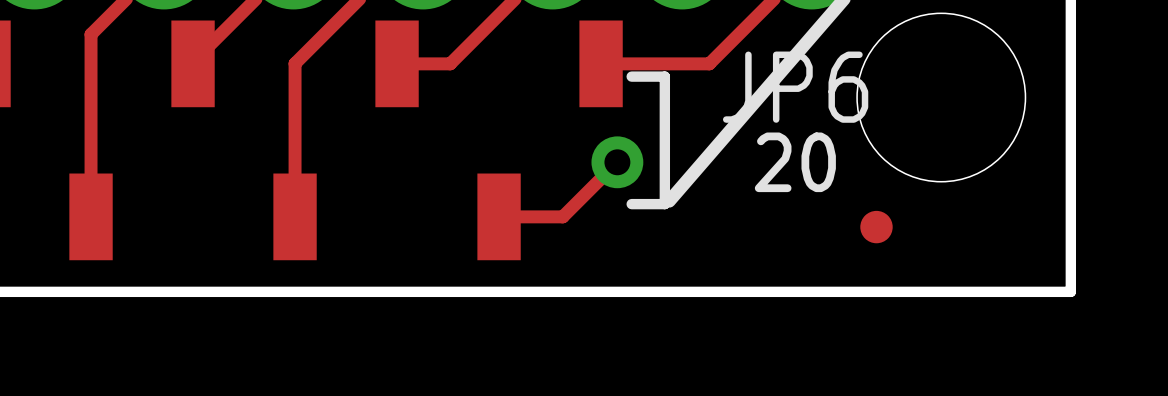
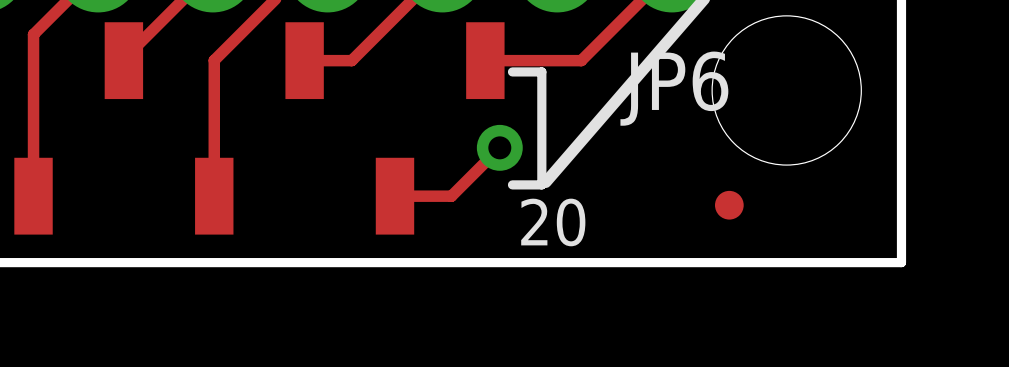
text position: 20 (795, 162) -> 20 (553, 222)

